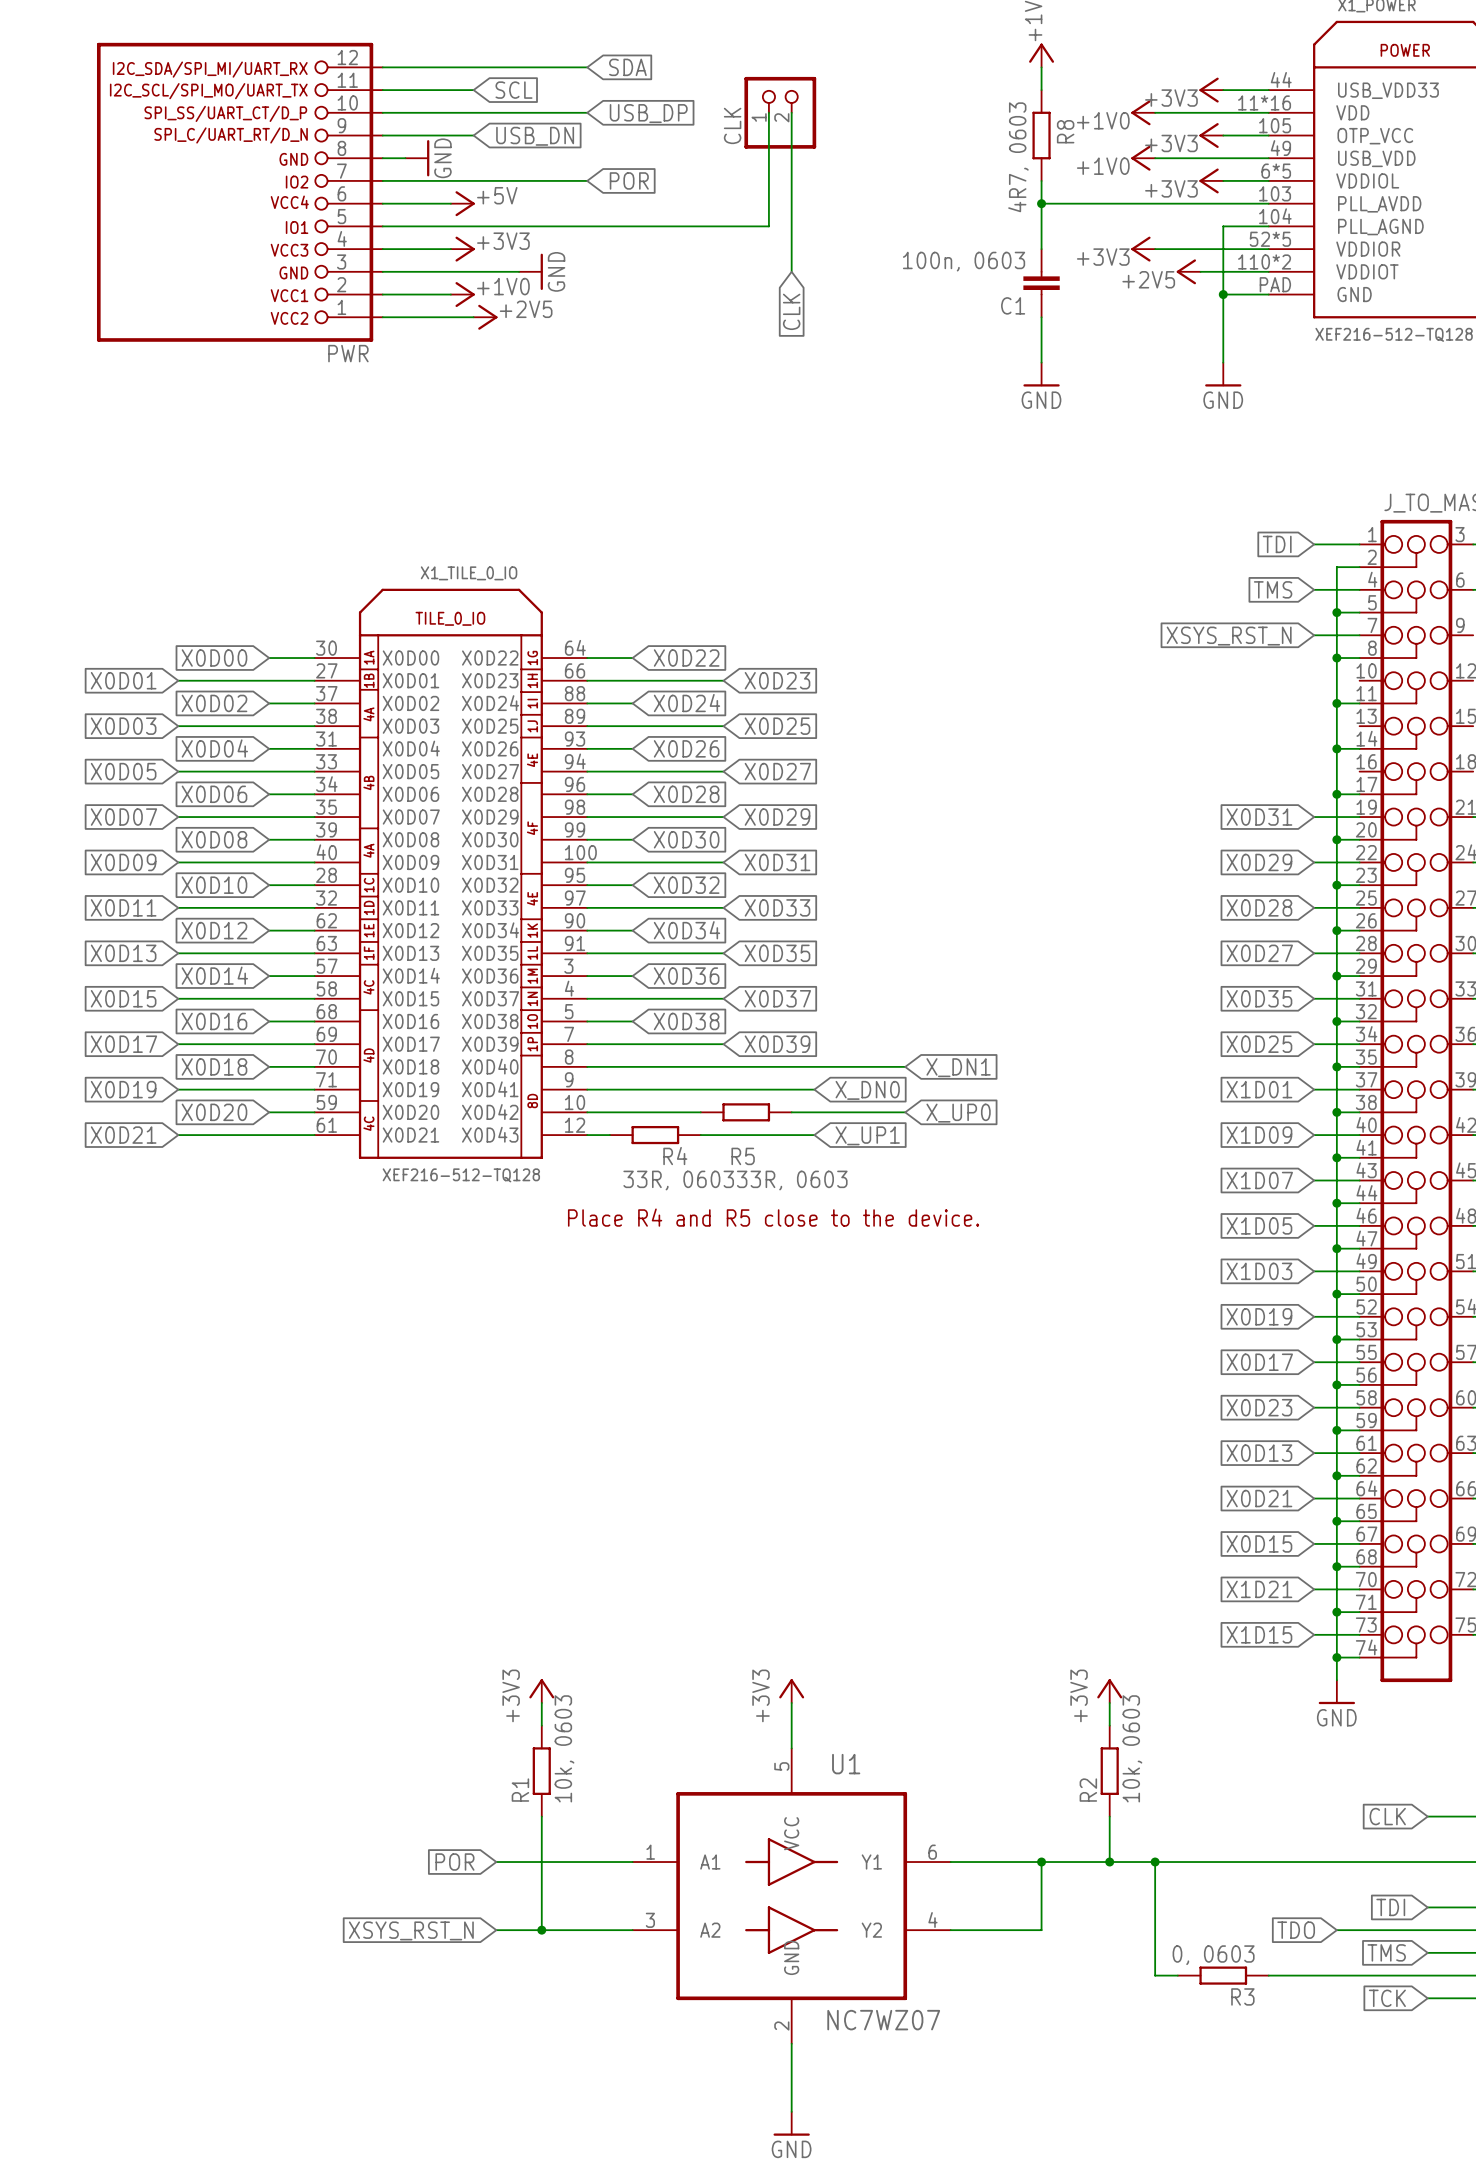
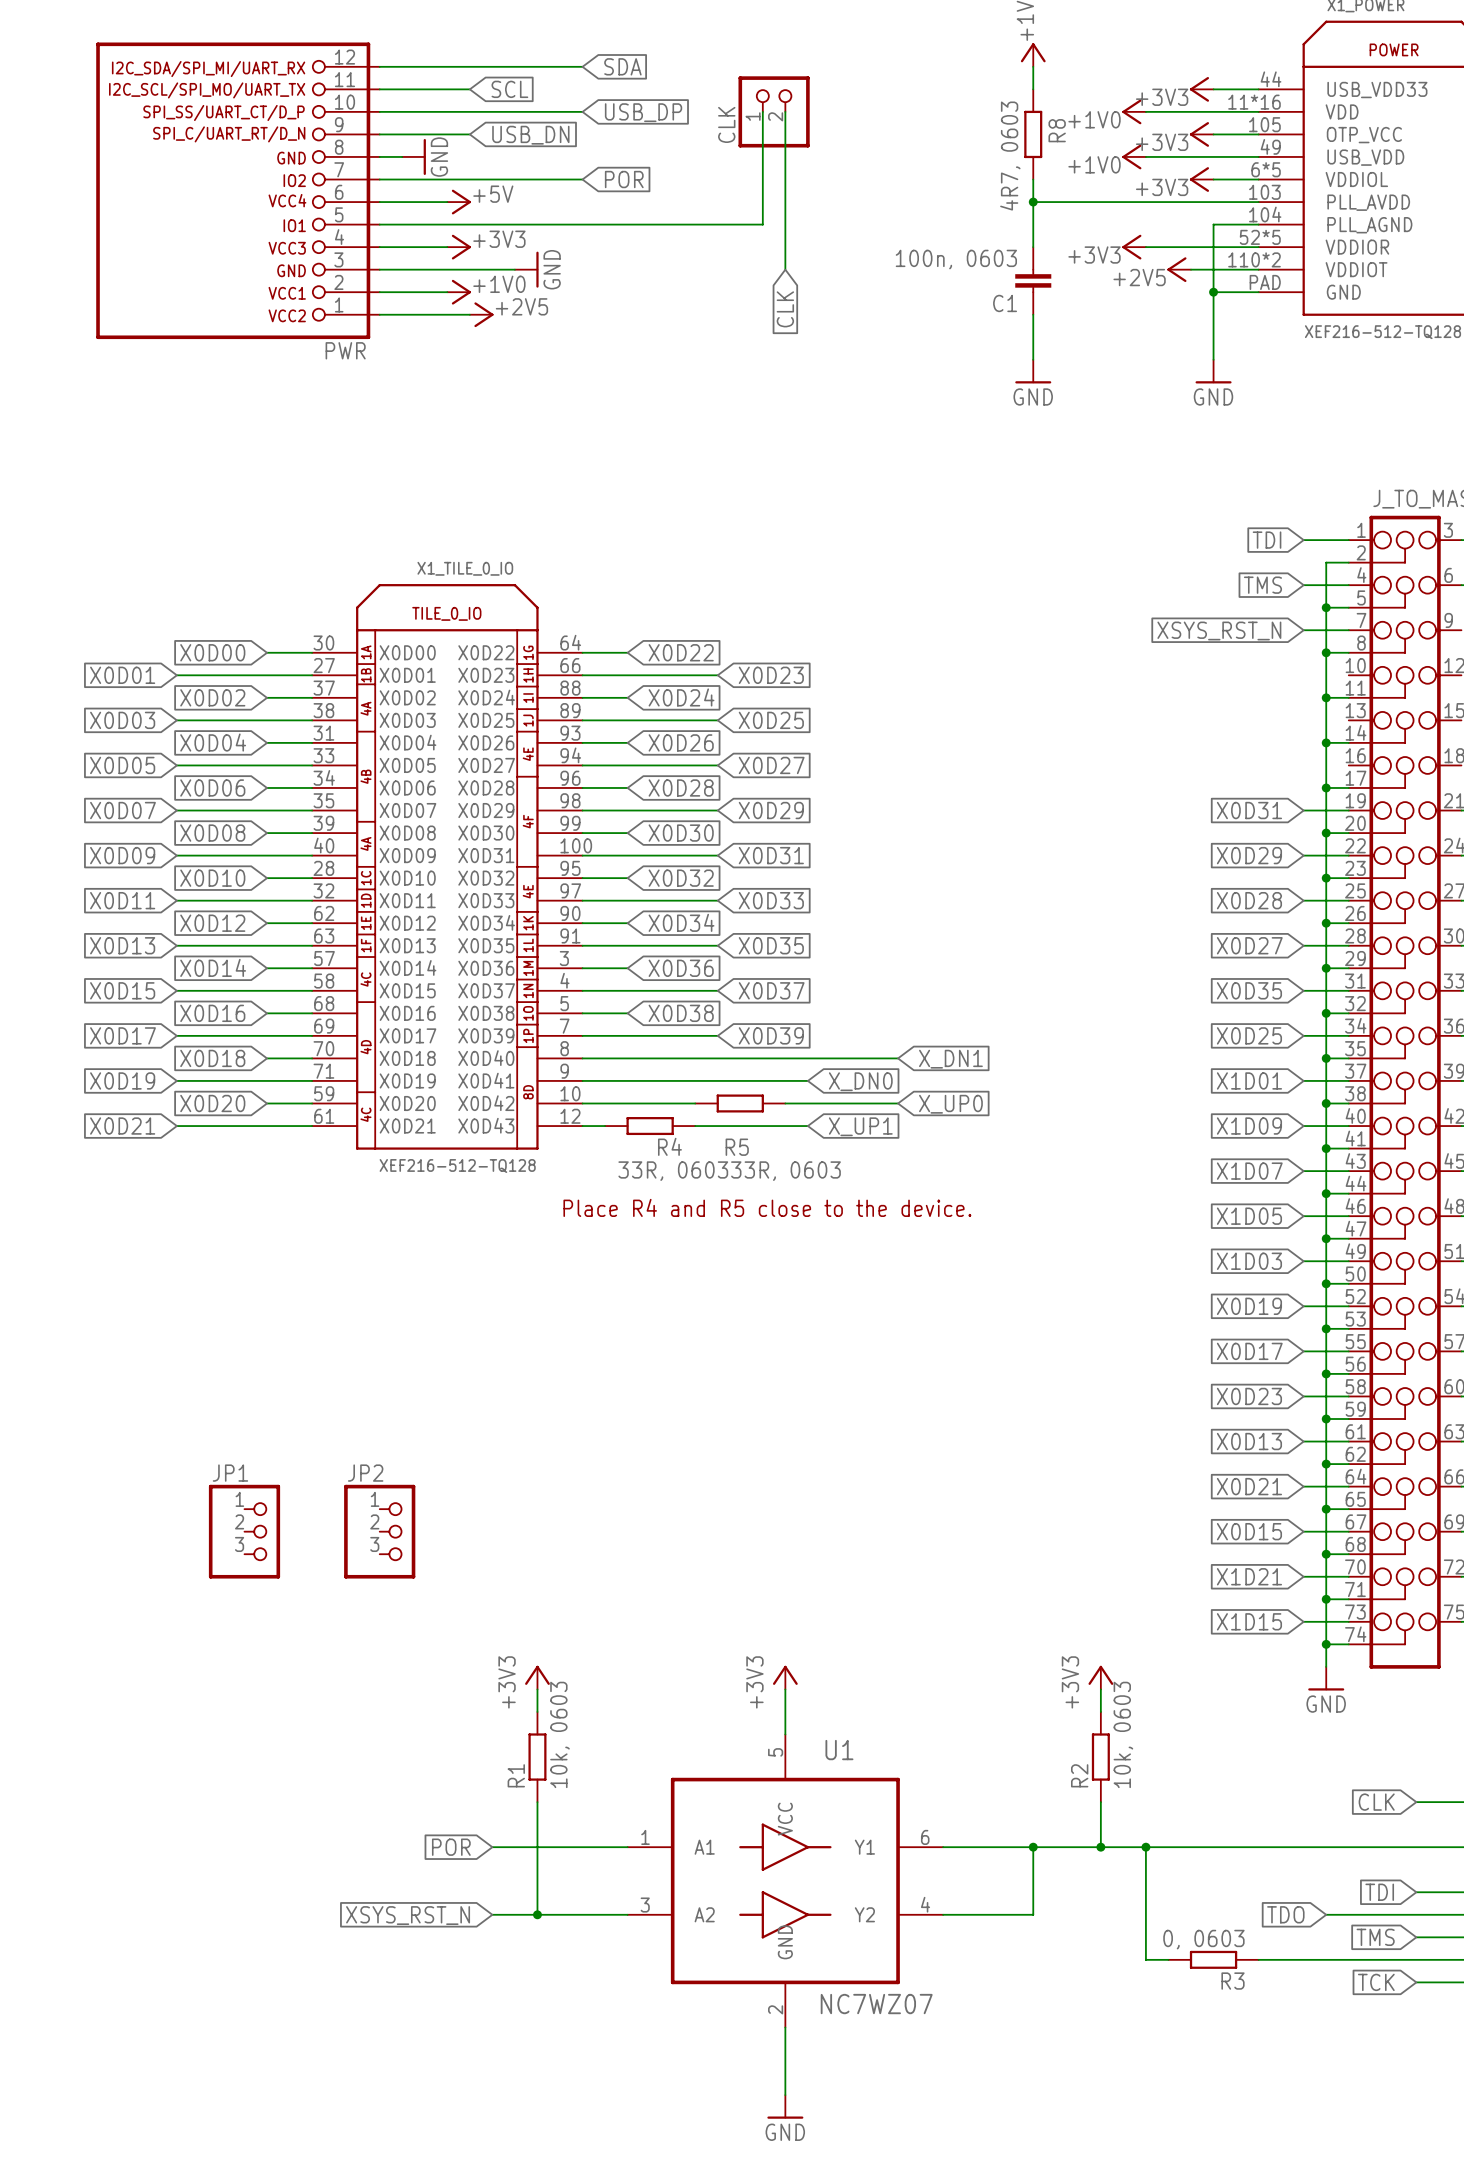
JP1: none -> (244, 1531)
JP2: none -> (379, 1531)

